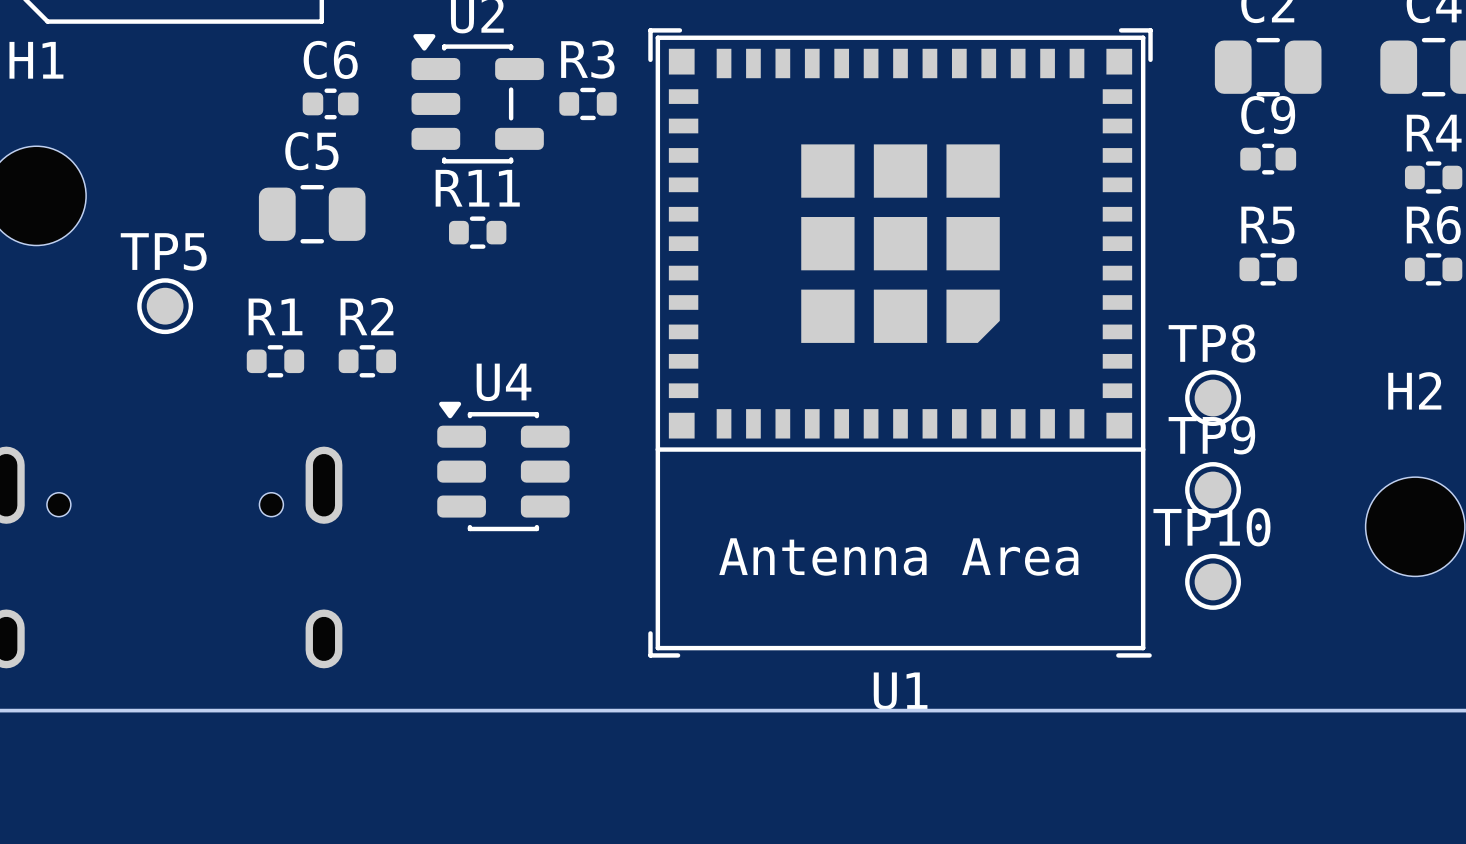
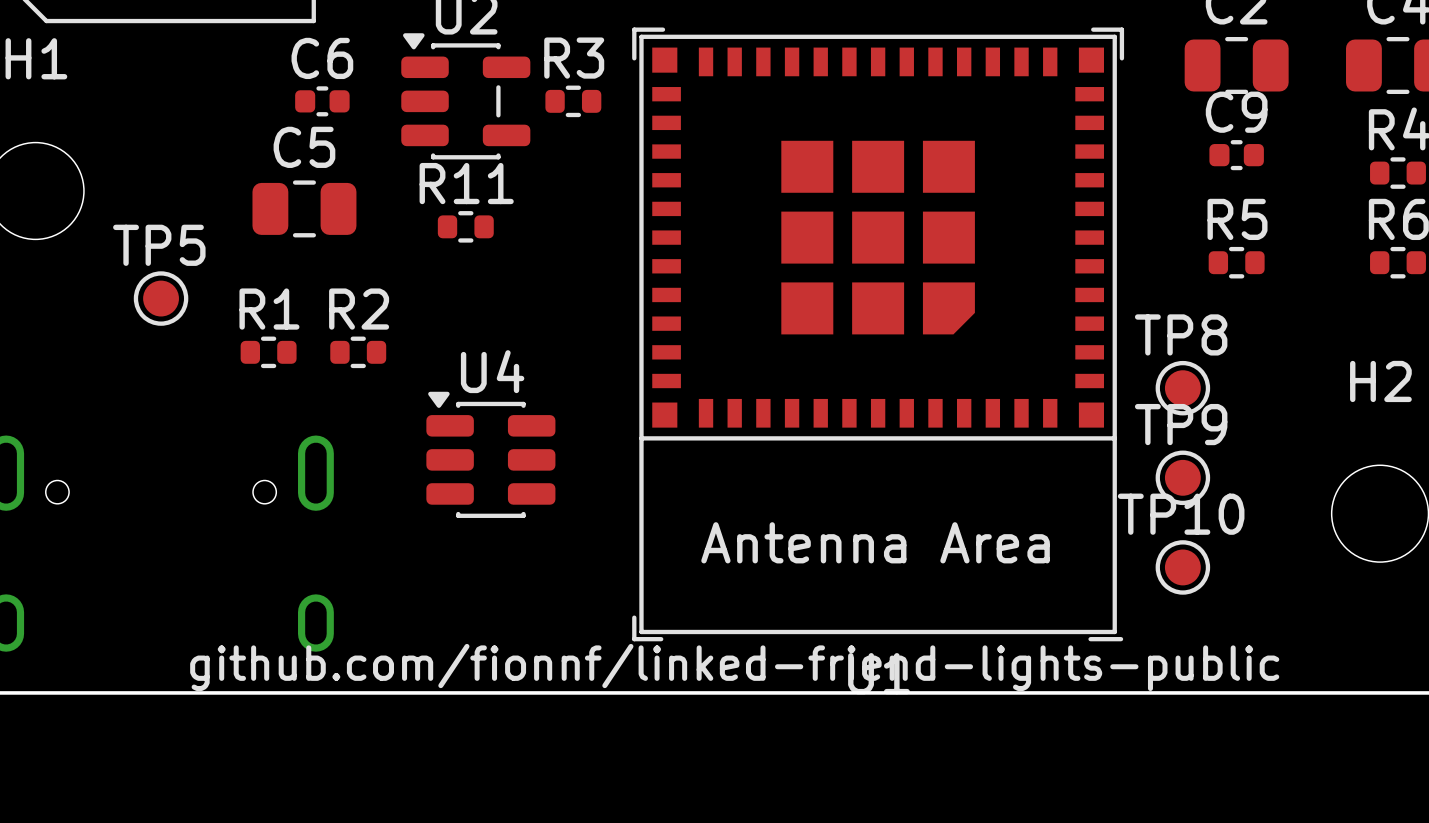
text: none -> github.com/fionnf/linked-friend-lights-public (734, 667)

